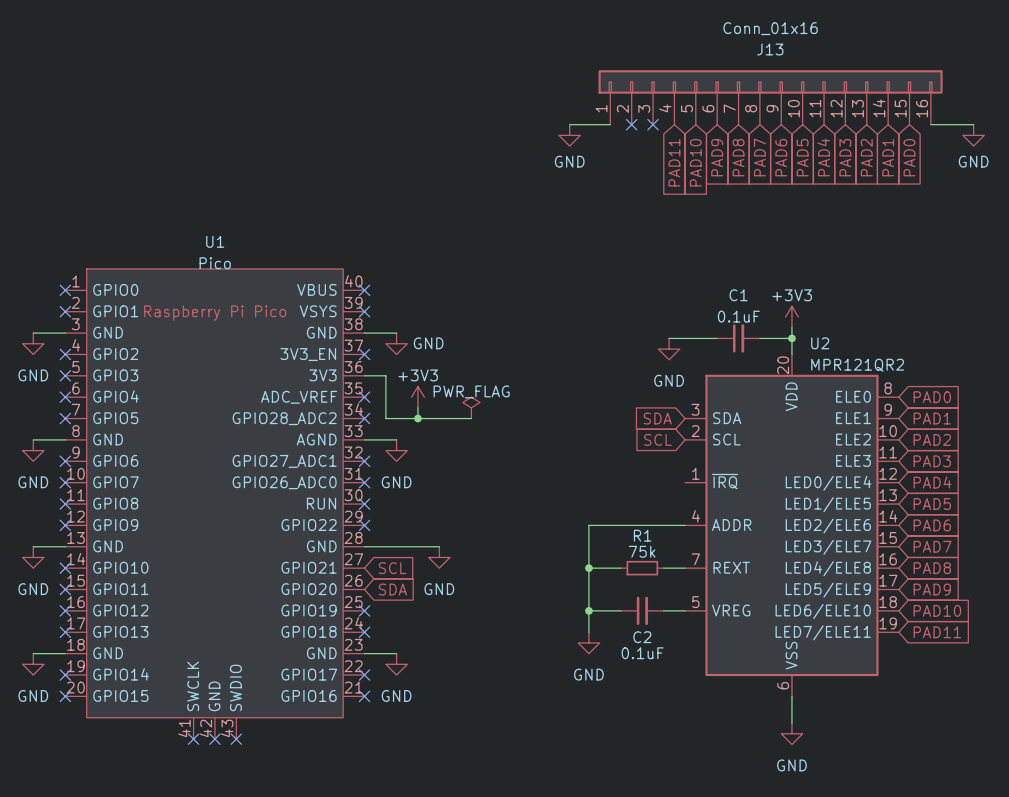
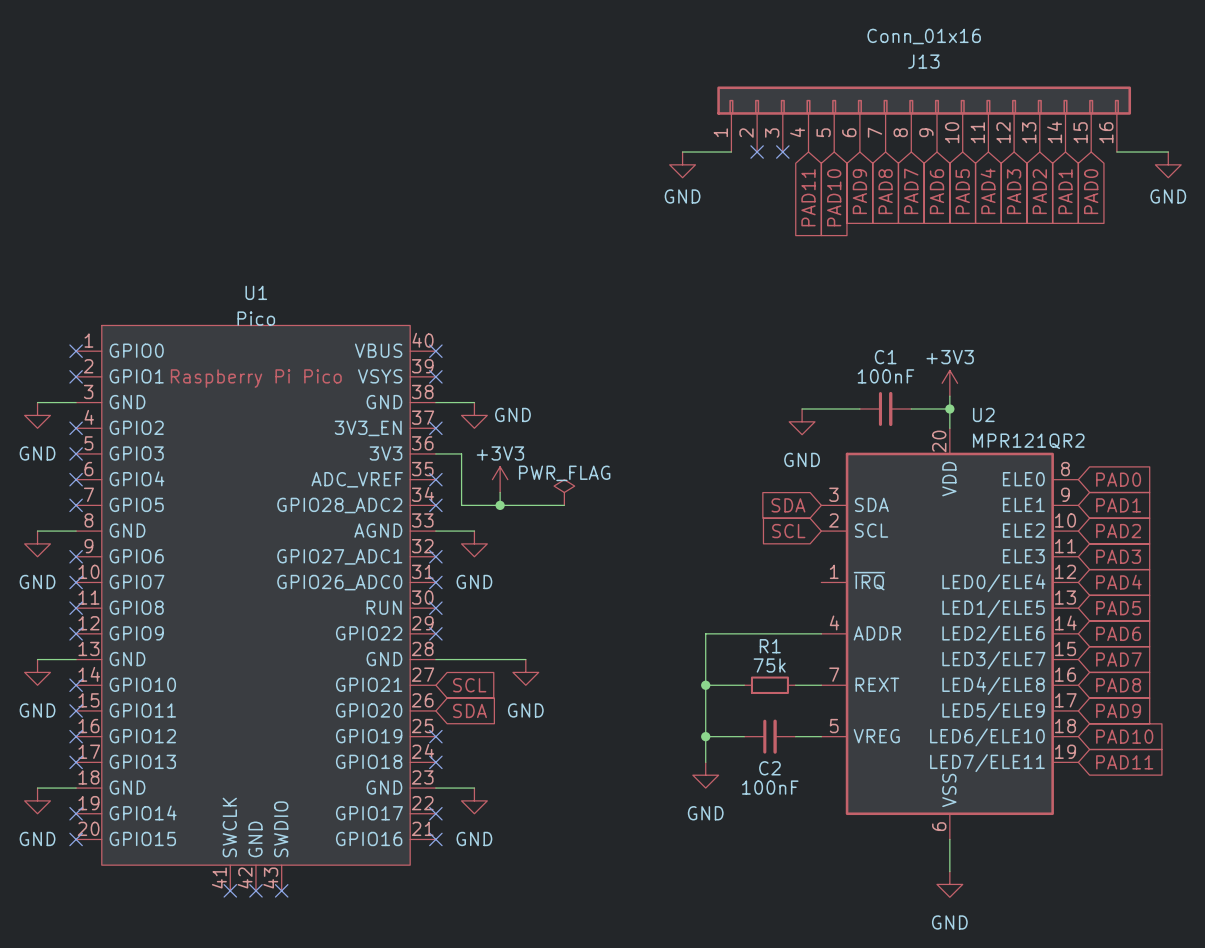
C1 value: 0.1uF (738, 316) -> 100nF (885, 376)
C2 value: 0.1uF (642, 653) -> 100nF (770, 787)

